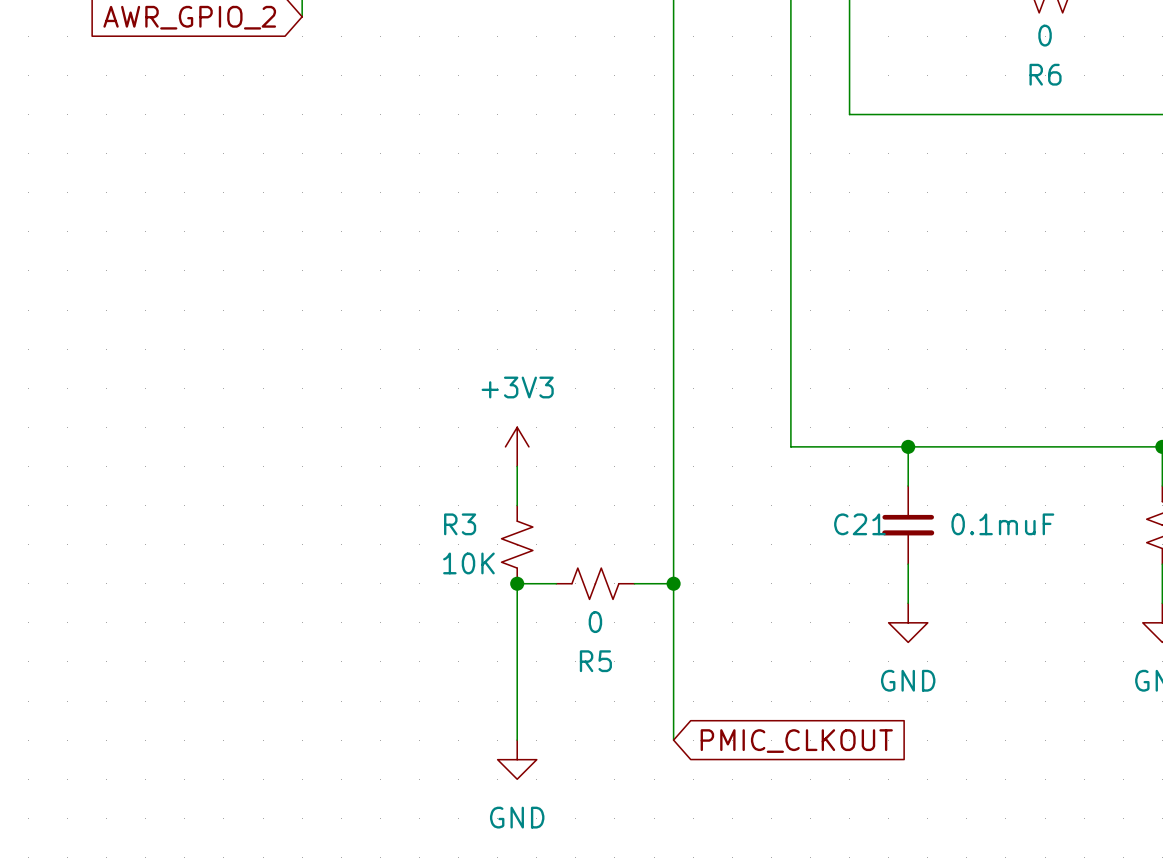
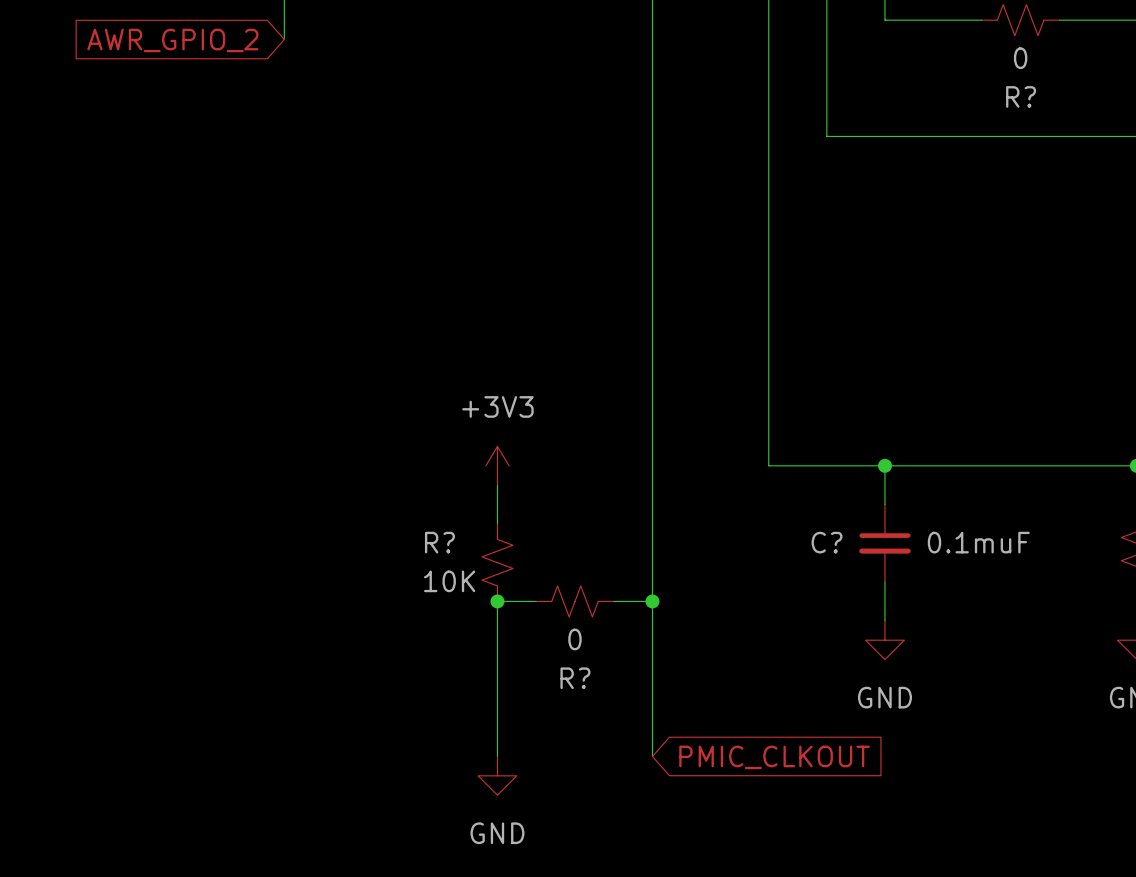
R6 name: R6 (1045, 74) -> R? (1021, 96)
R3 name: R3 (460, 524) -> R? (439, 542)
C21 name: C21 (859, 524) -> C? (827, 542)
R5 name: R5 (595, 661) -> R? (575, 678)

